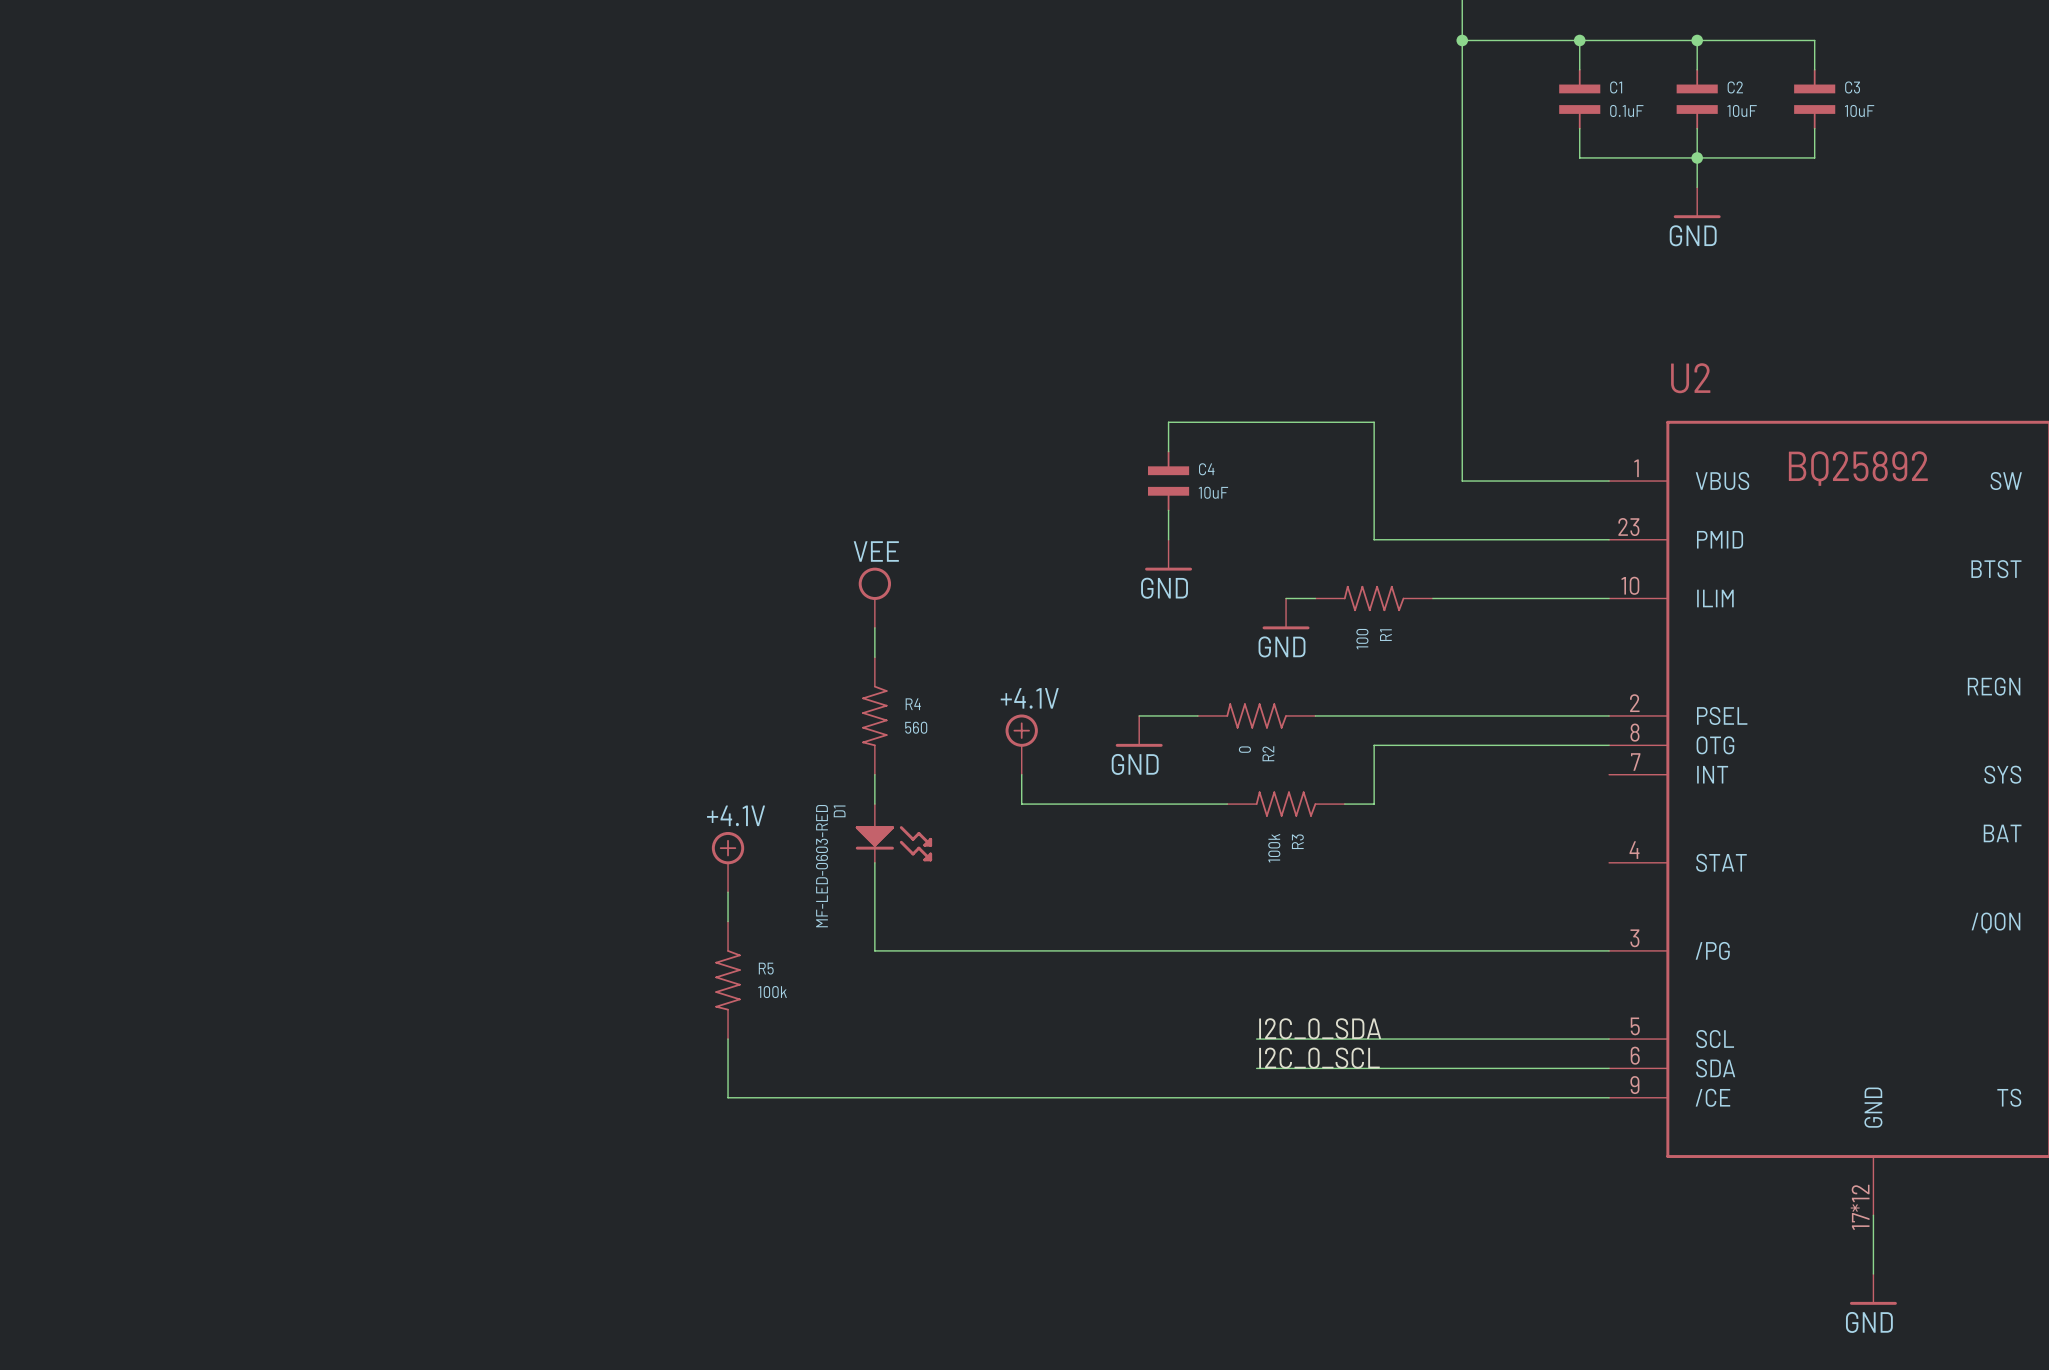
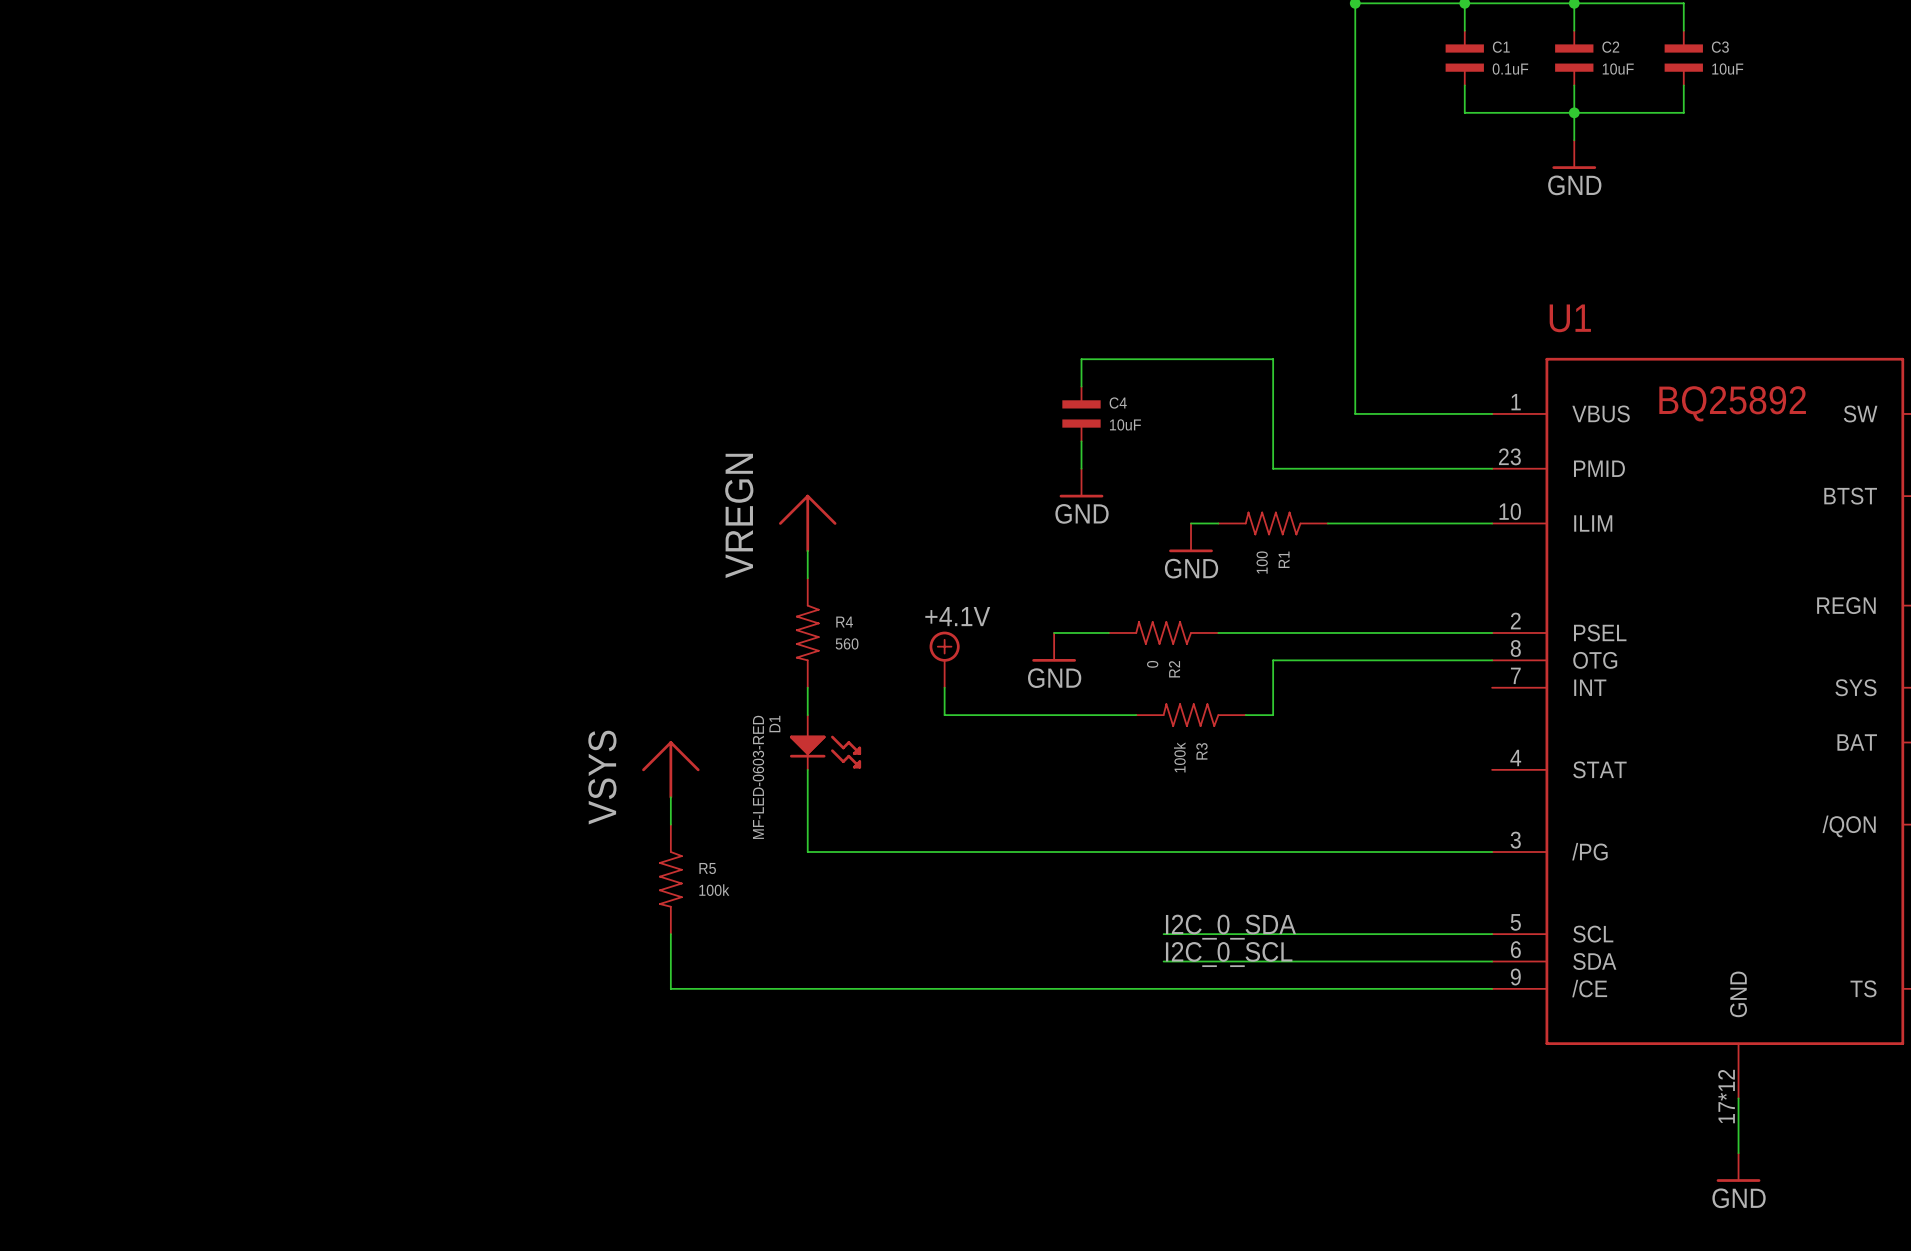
U2 name: U2 (1690, 378) -> U1 (1570, 318)
power symbol: VEE (874, 597) -> VREGN (807, 523)
power symbol: +4.1V (728, 862) -> VSYS (670, 769)

